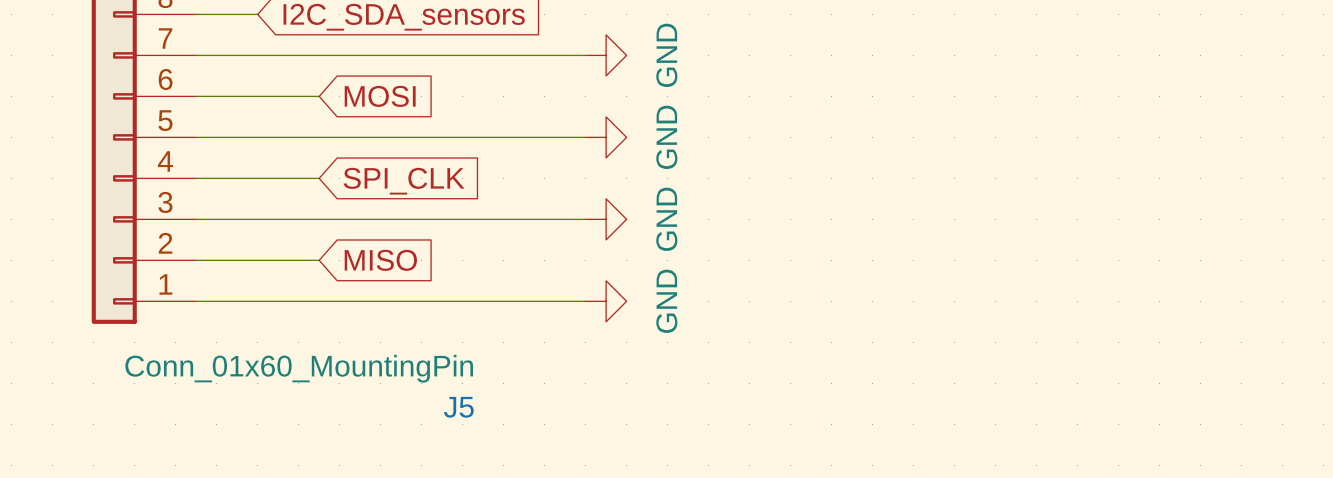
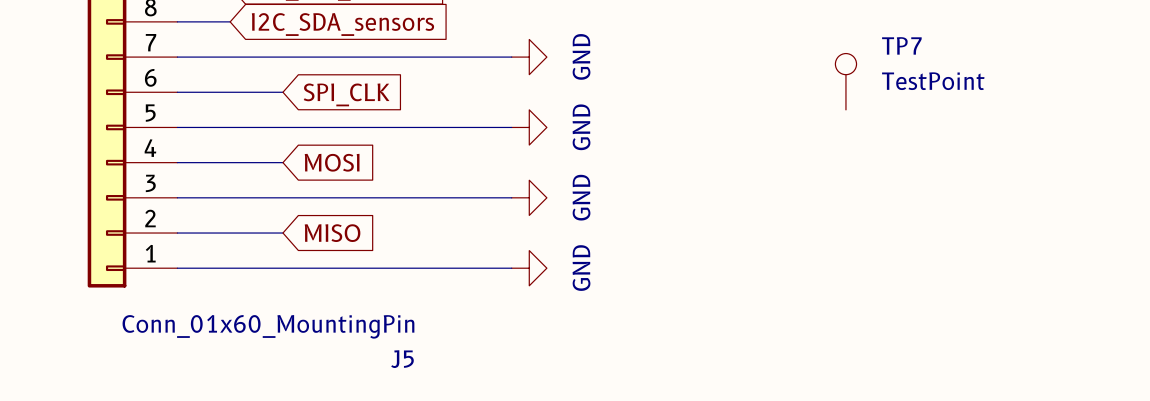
TP7: none -> TestPoint (845, 81)
global label: MOSI (380, 96) -> SPI_CLK (346, 94)
global label: SPI_CLK (404, 181) -> MOSI (332, 162)

